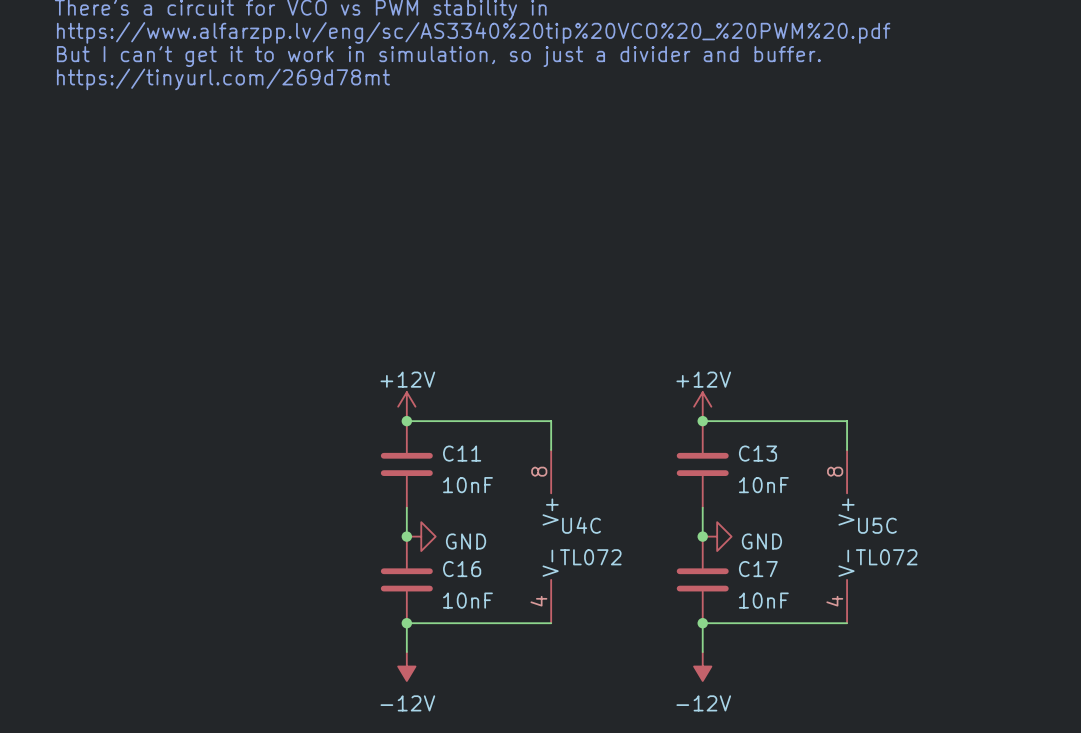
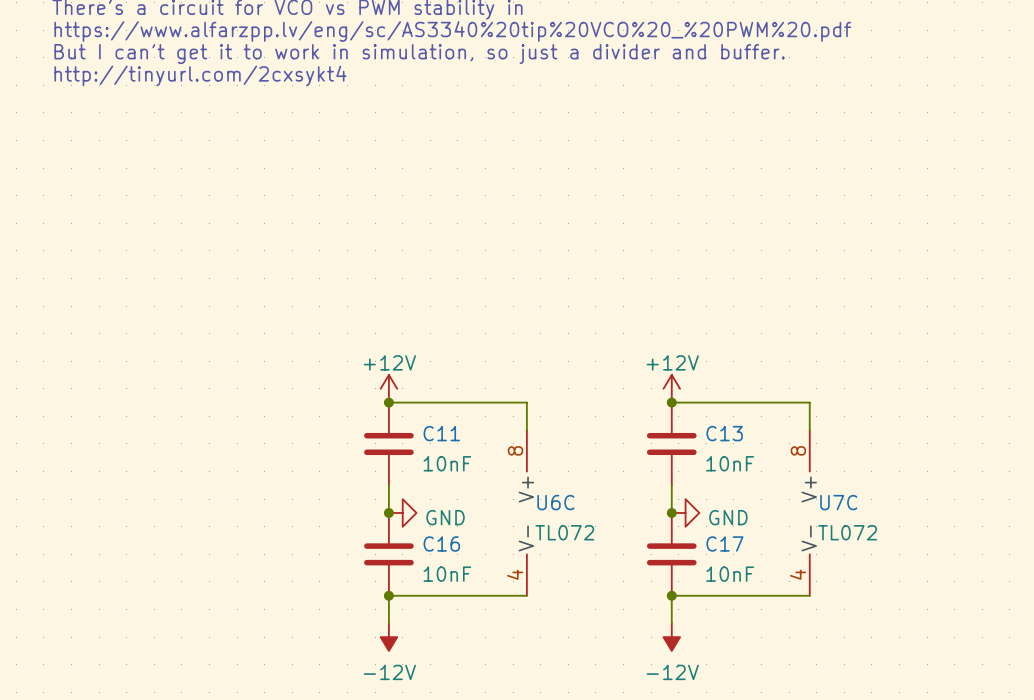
text: https://tinyurl.com/269d78mt (223, 79) -> http://tinyurl.com/2cxsykt4 (200, 75)
U4C name: U4C (581, 525) -> U6C (555, 502)
U5C name: U5C (877, 525) -> U7C (838, 502)

